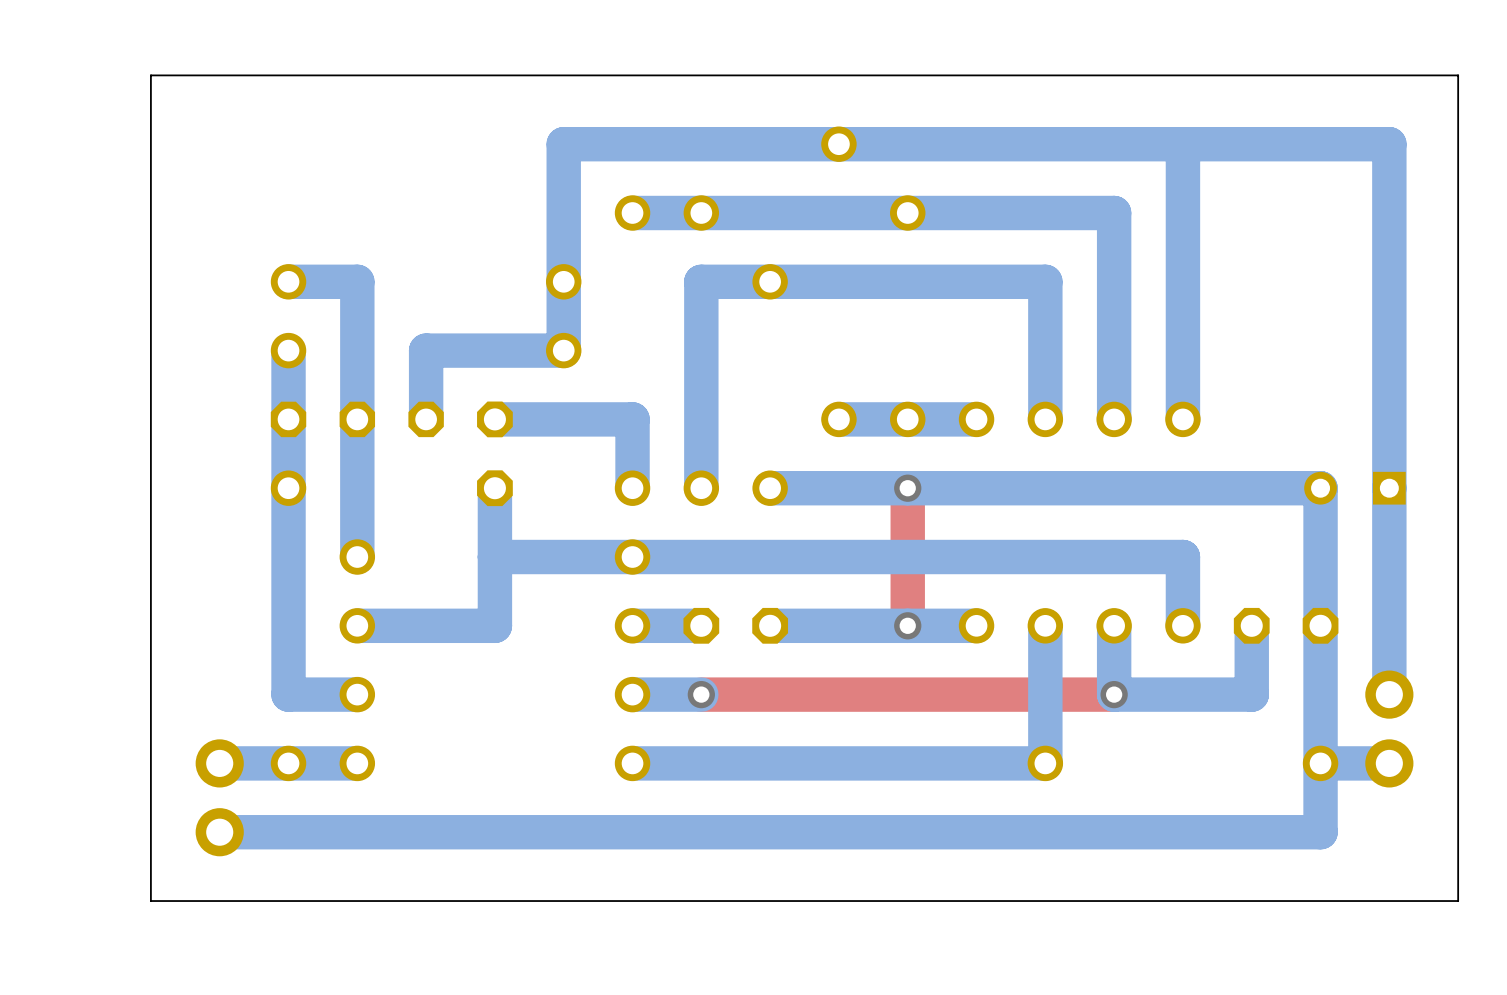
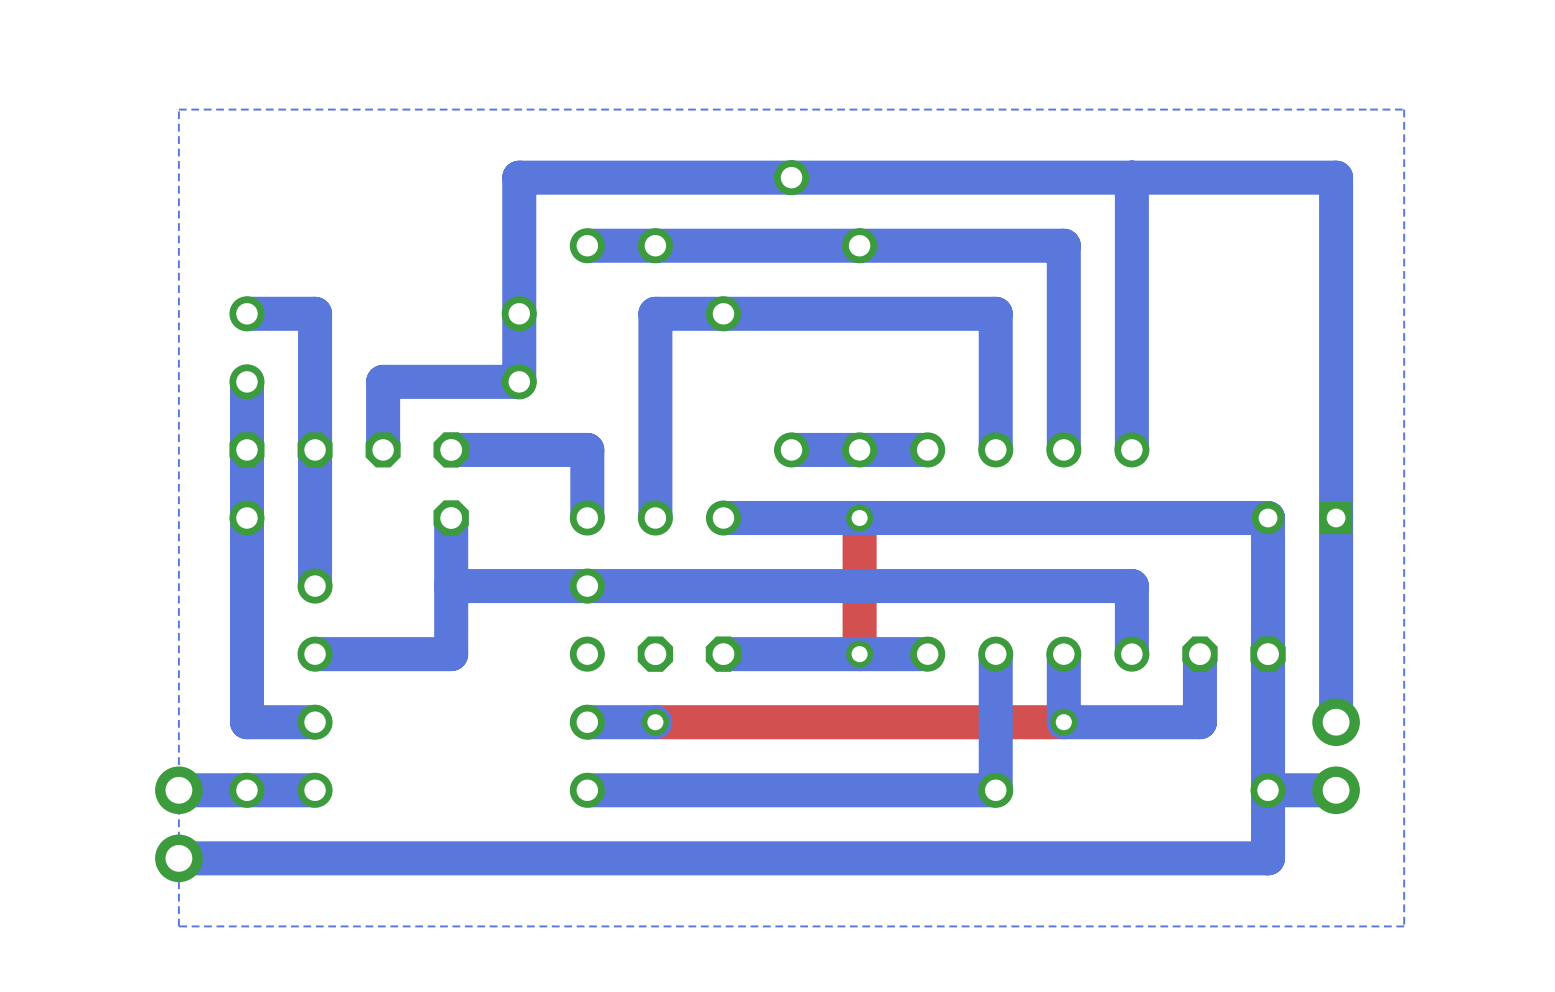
board edge: (1458, 75) (150, 75) (150, 901) (1458, 901) (1458, 75) -> none
bottom zone outline: none -> (1404, 109) (178, 109) (178, 926) (1404, 926) (1404, 109)
bottom track: (701, 625) (632, 625) -> none

